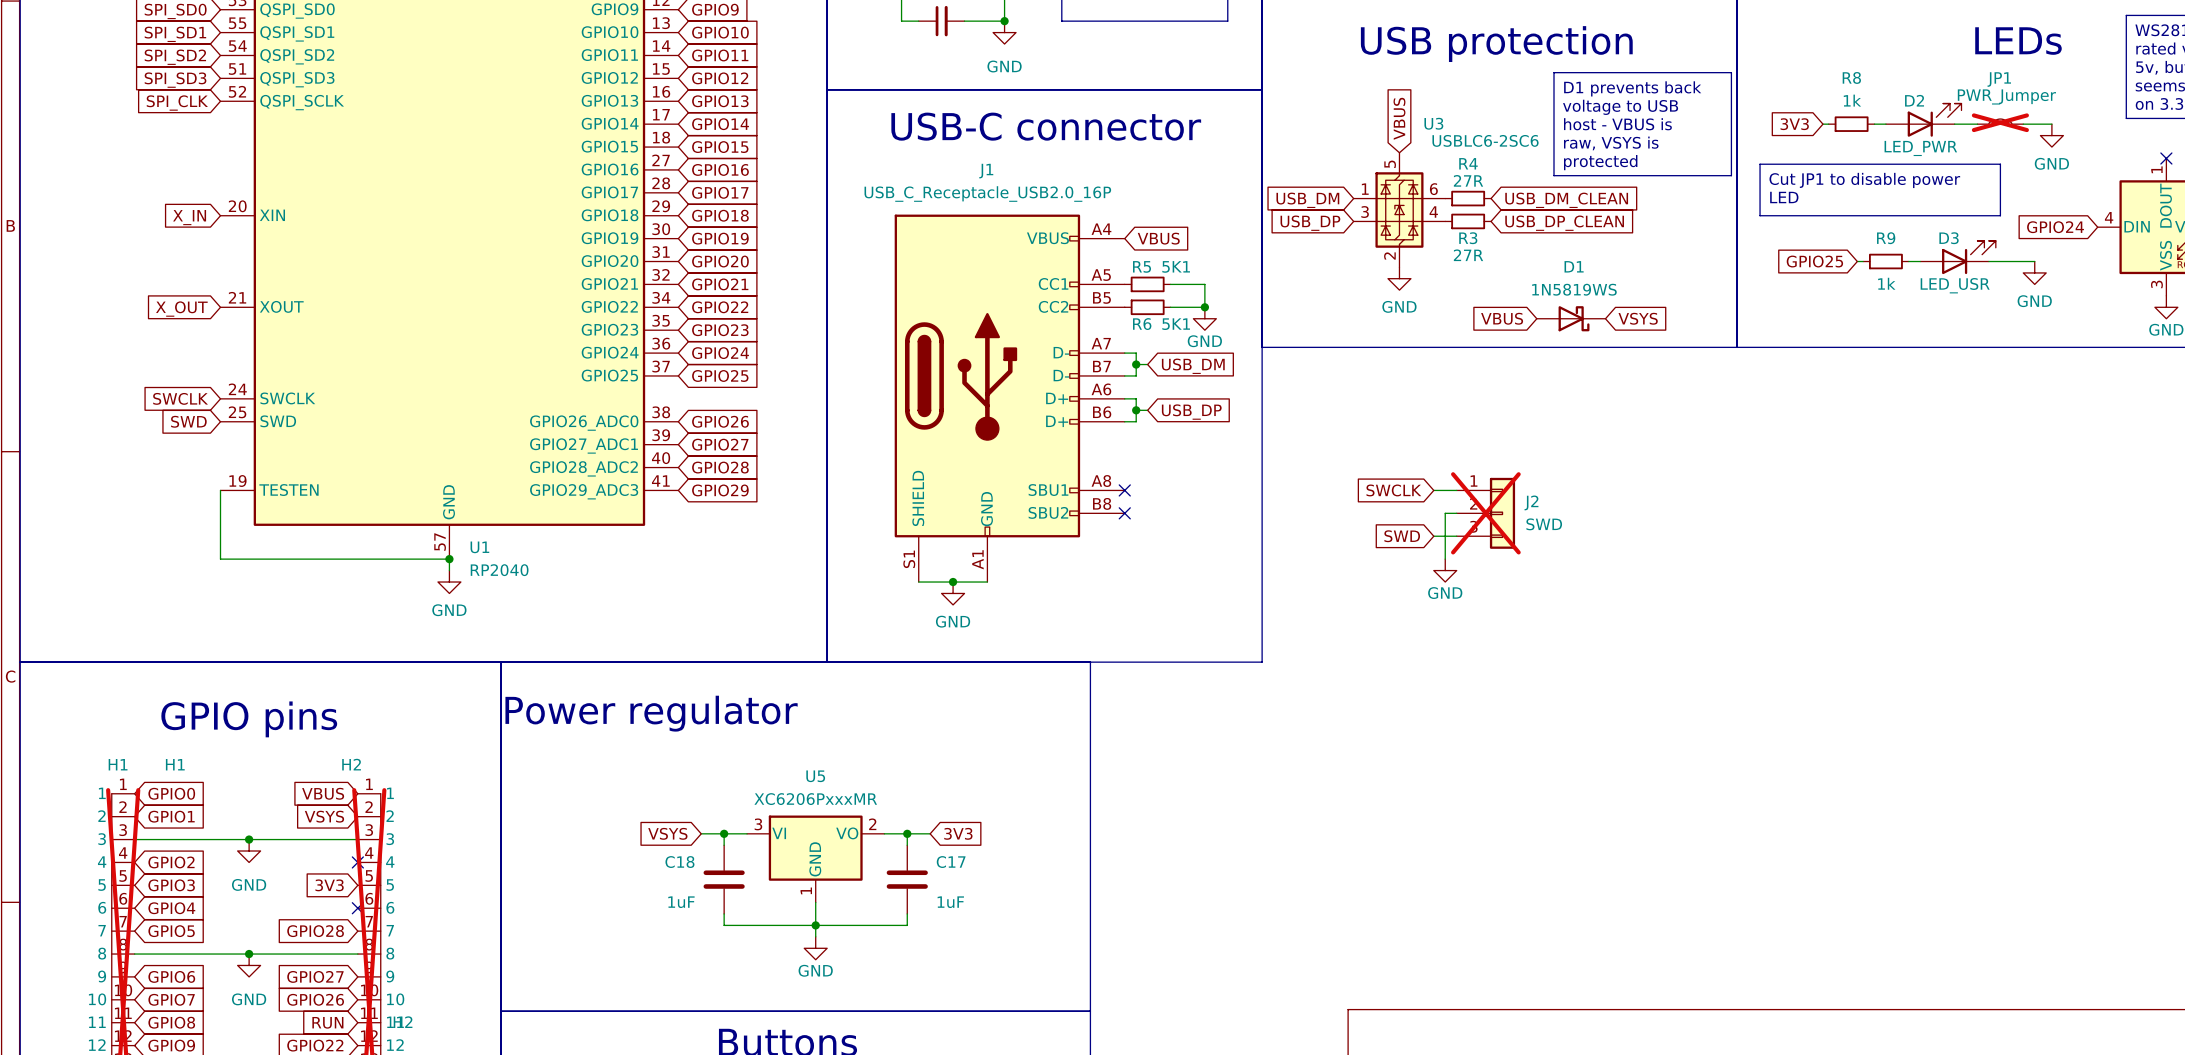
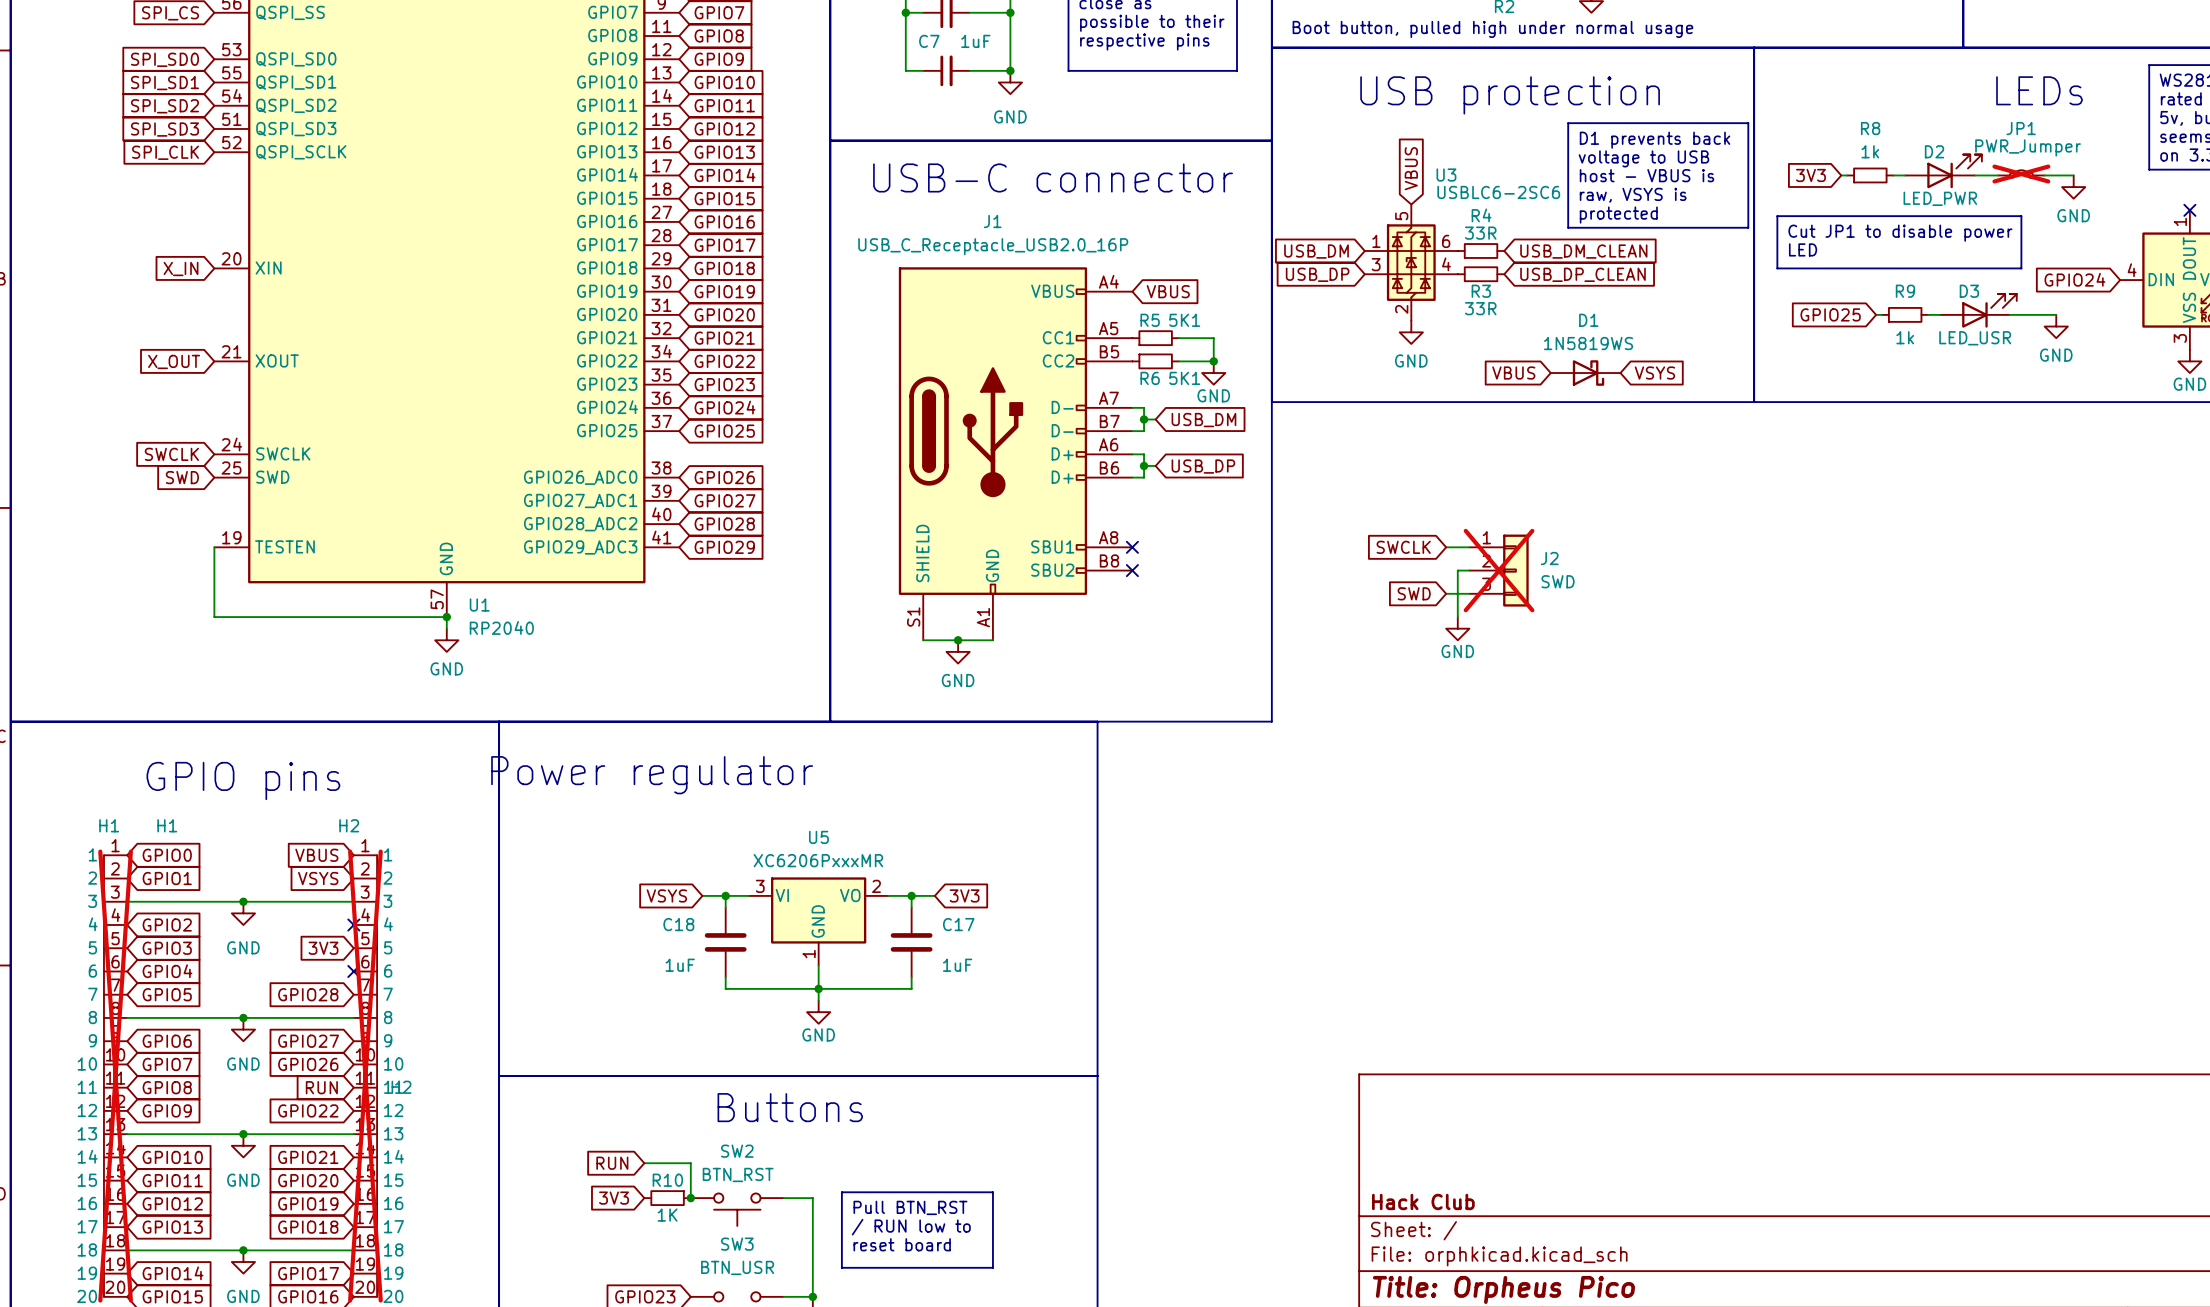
R4 value: 27R (1468, 180) -> 33R (1480, 233)
R3 value: 27R (1468, 255) -> 33R (1480, 308)

